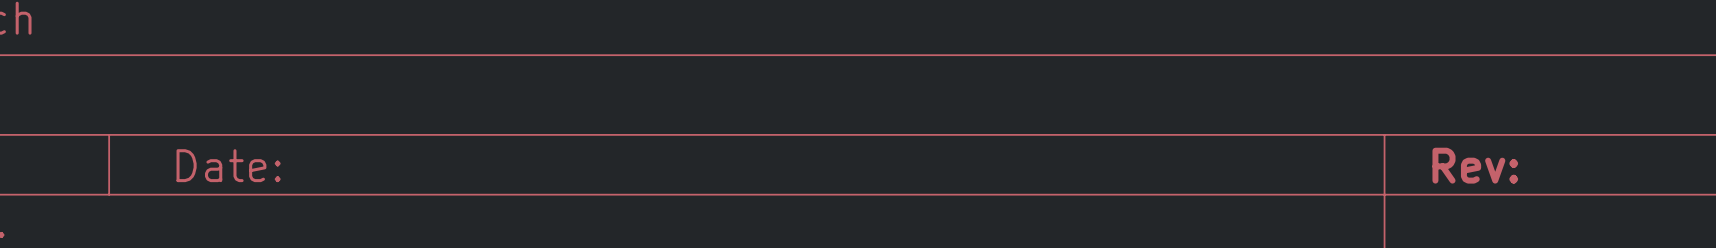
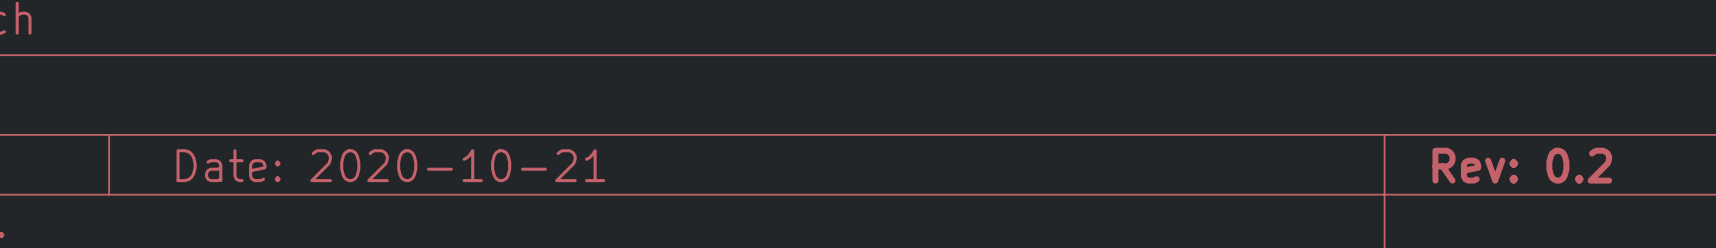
title block: Date: (228, 165) -> Date: 2020-10-21 (390, 165)
title block: Rev: (1475, 165) -> Rev: 0.2 (1522, 165)

